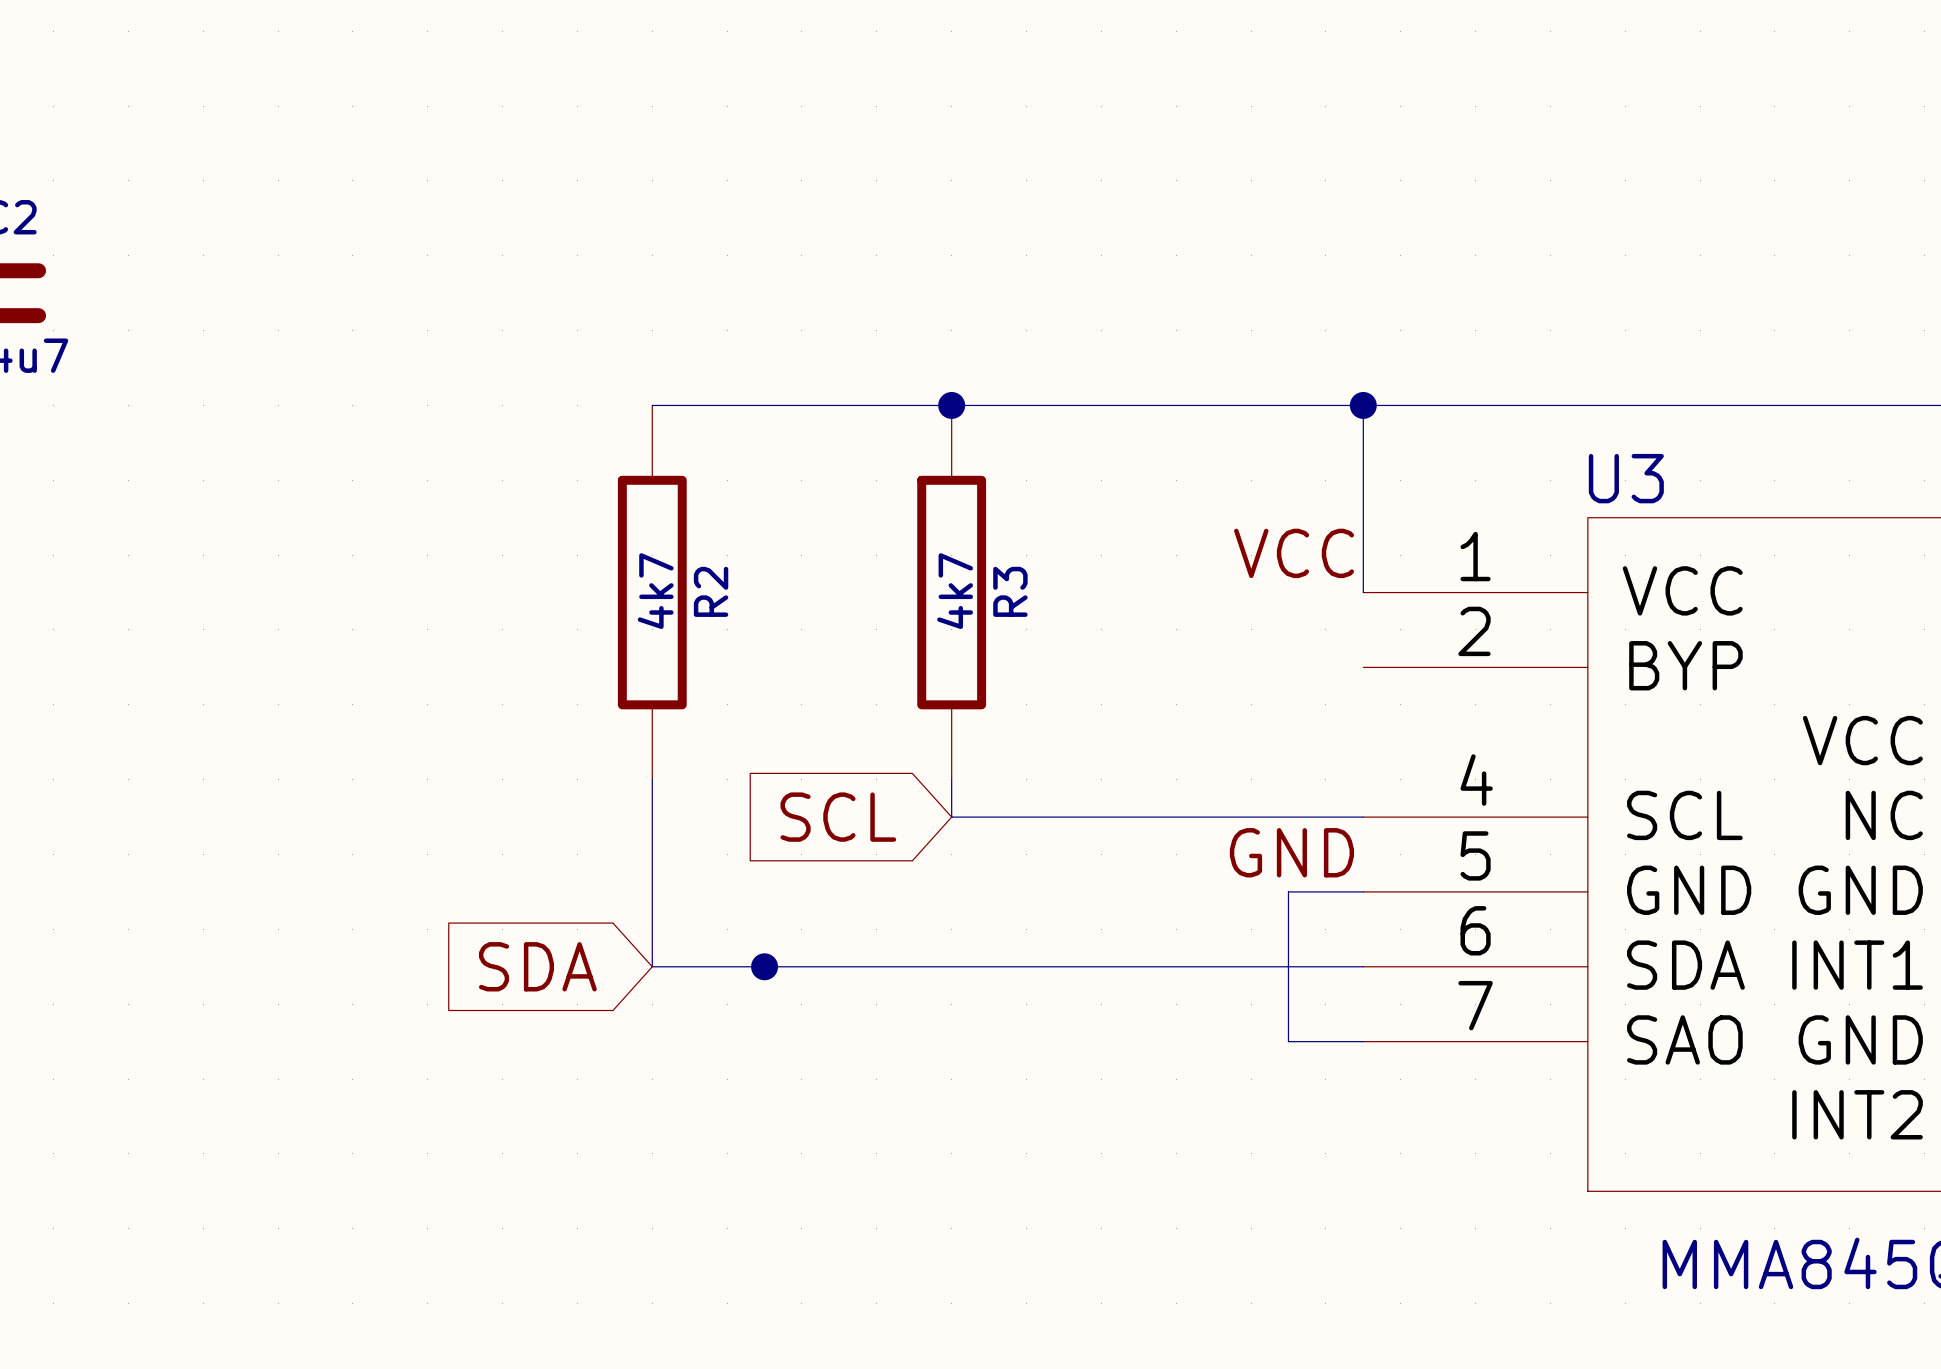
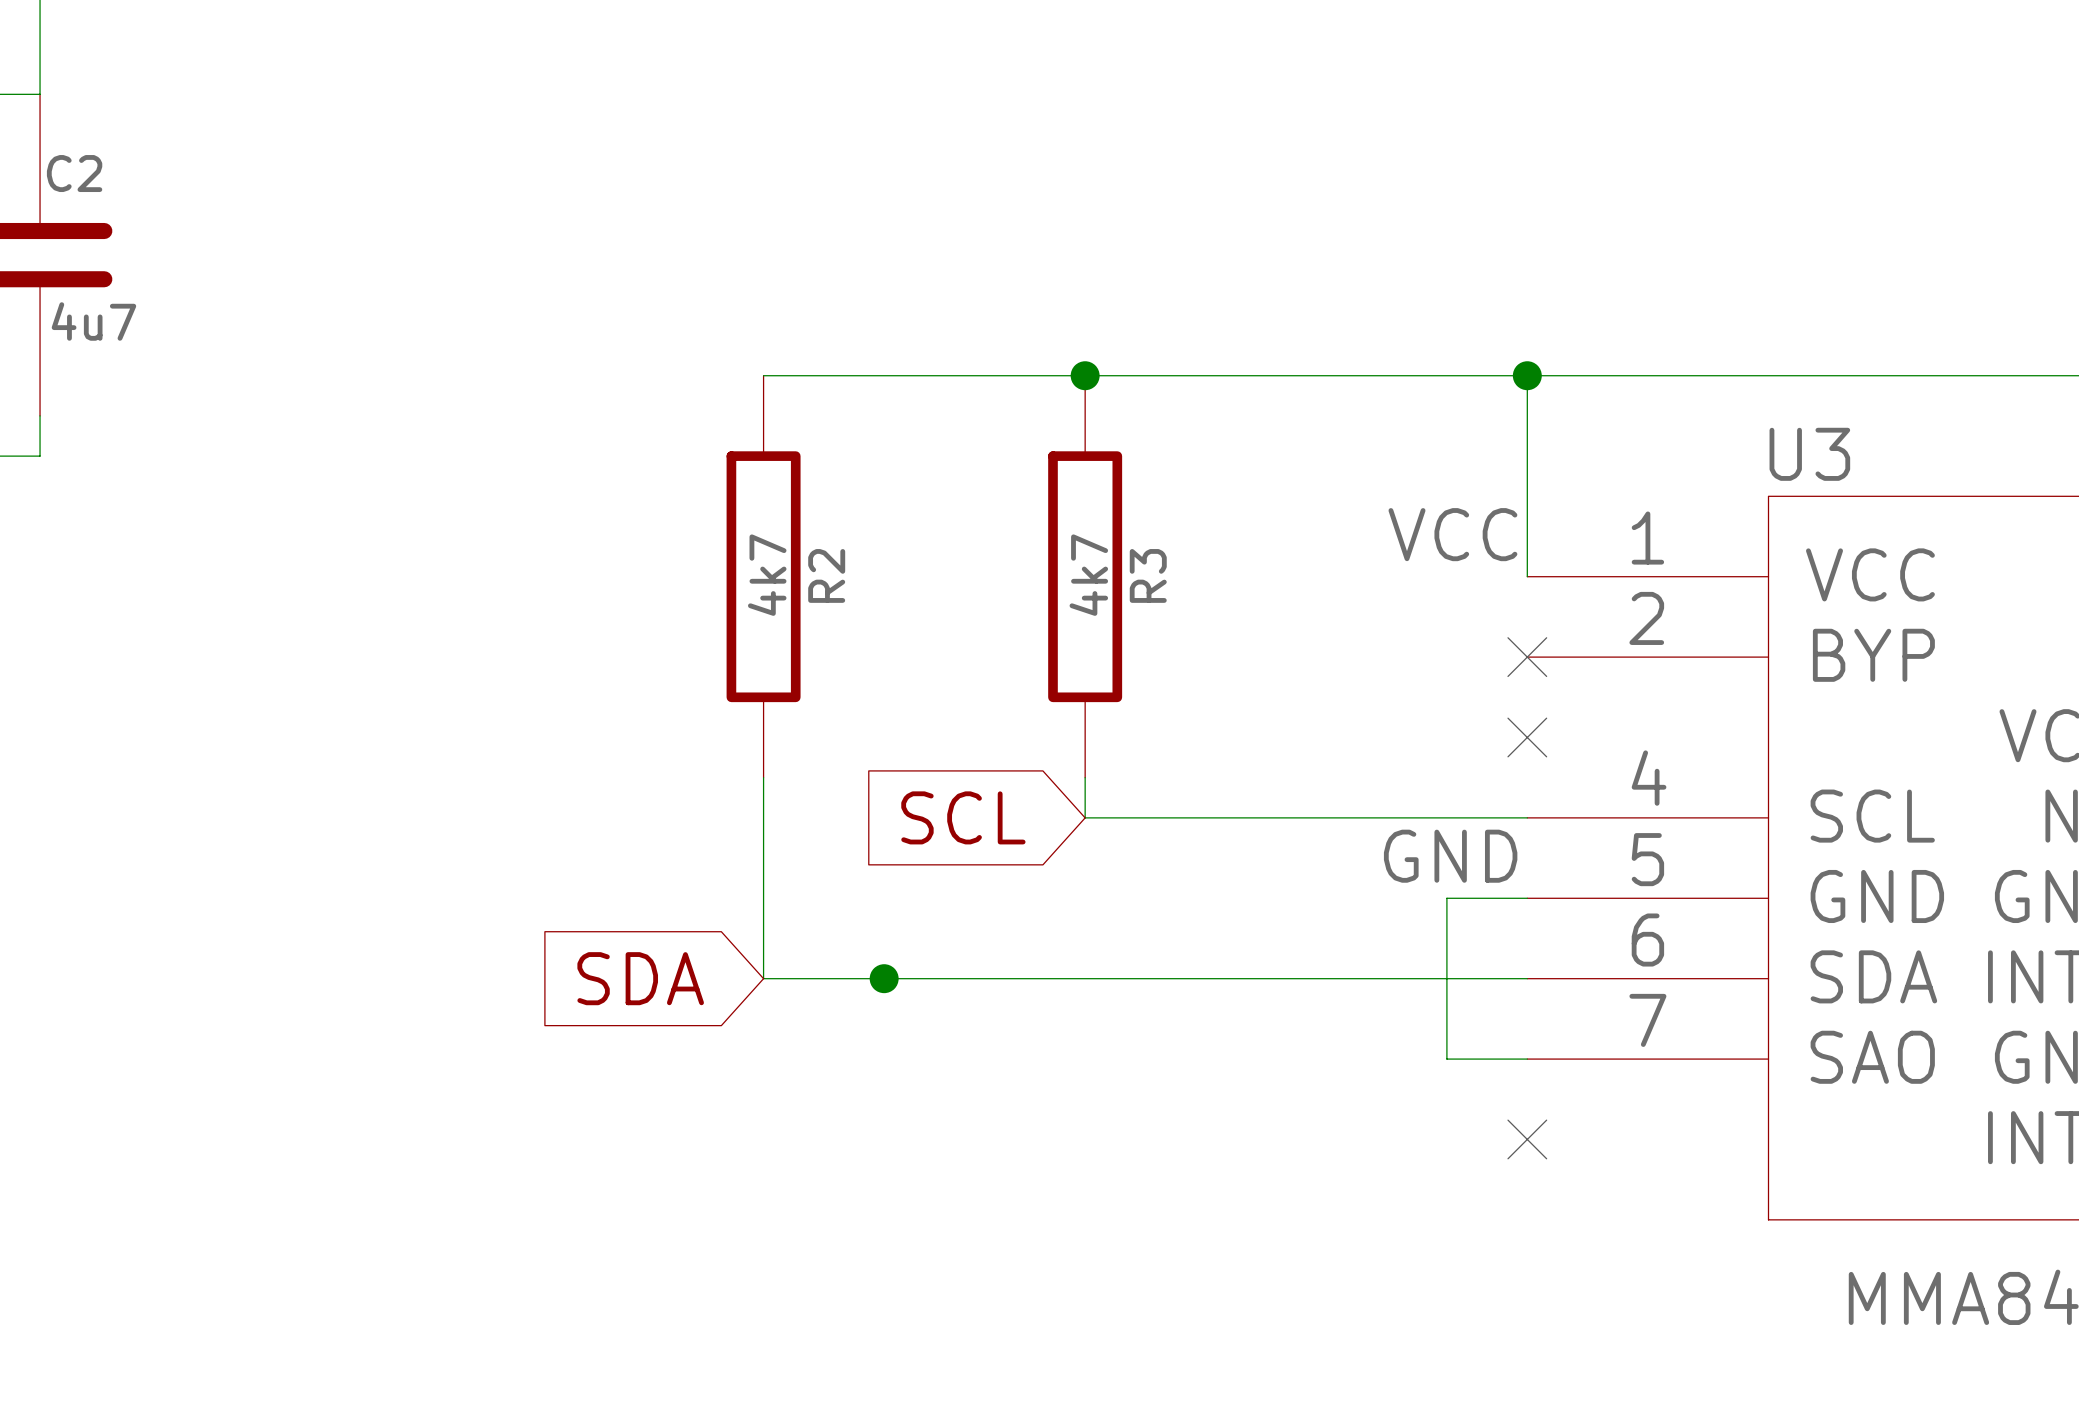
no-connect mark: none -> (1527, 657)
no-connect mark: none -> (1527, 737)
no-connect mark: none -> (1527, 1139)

